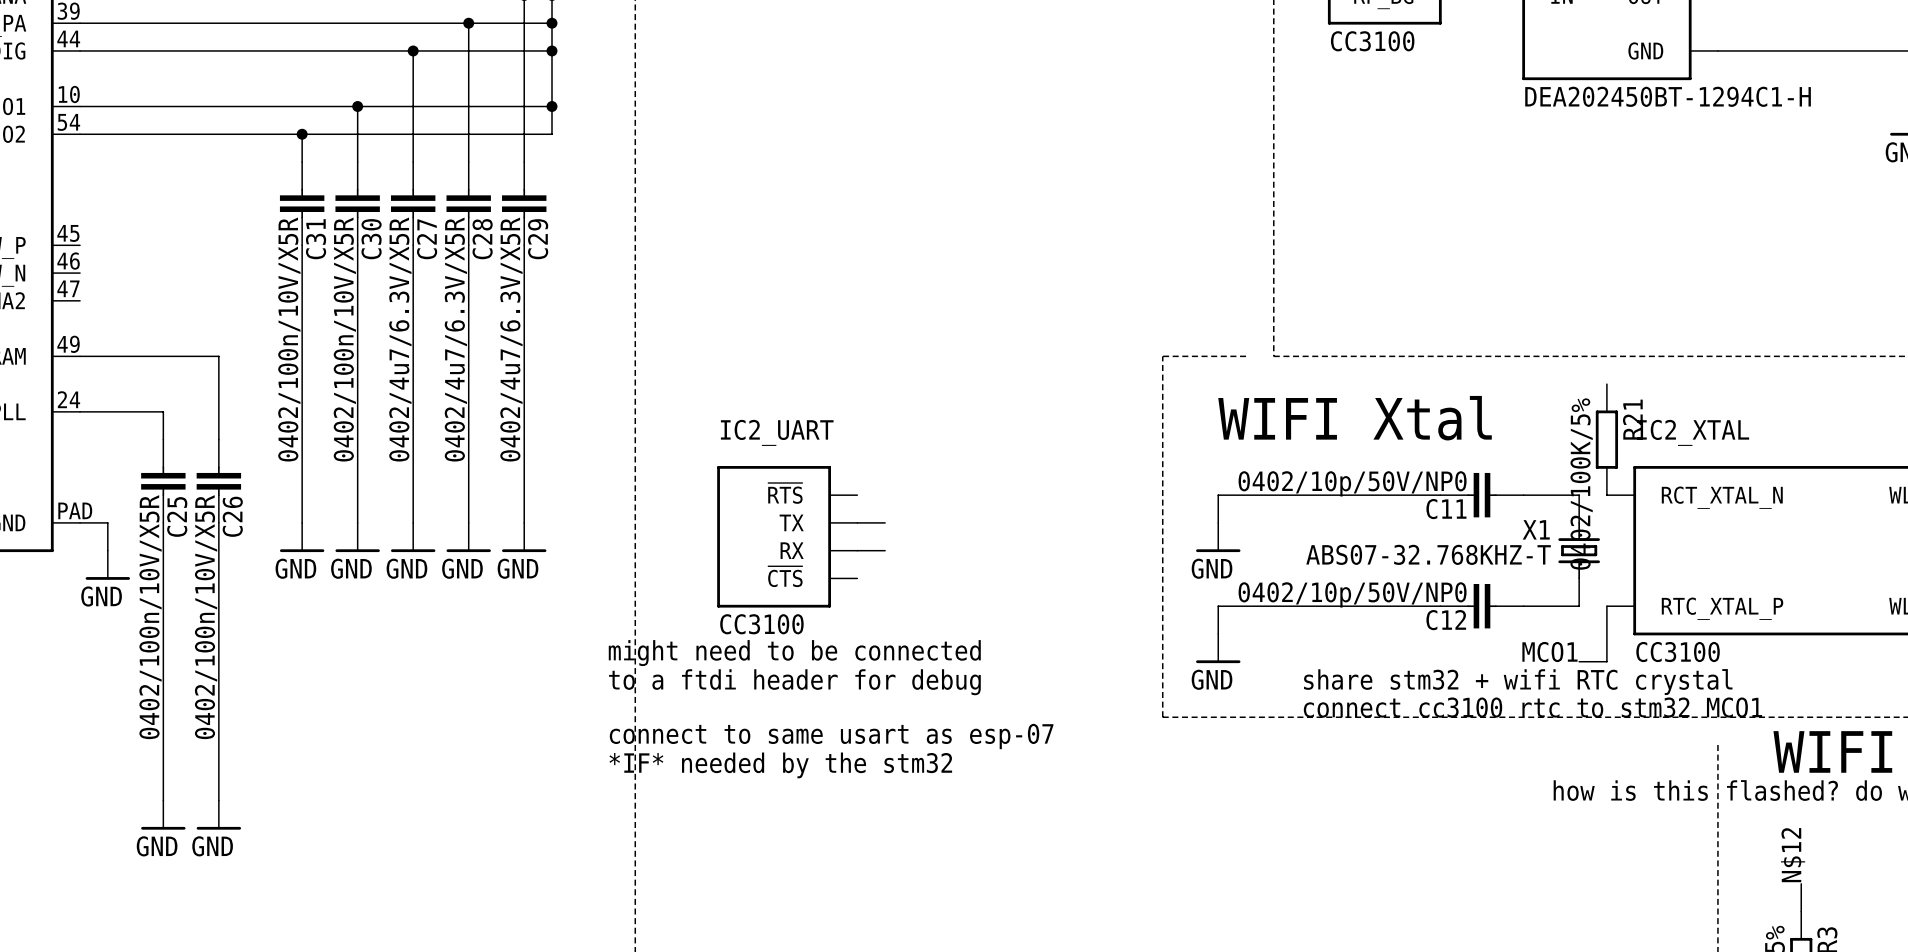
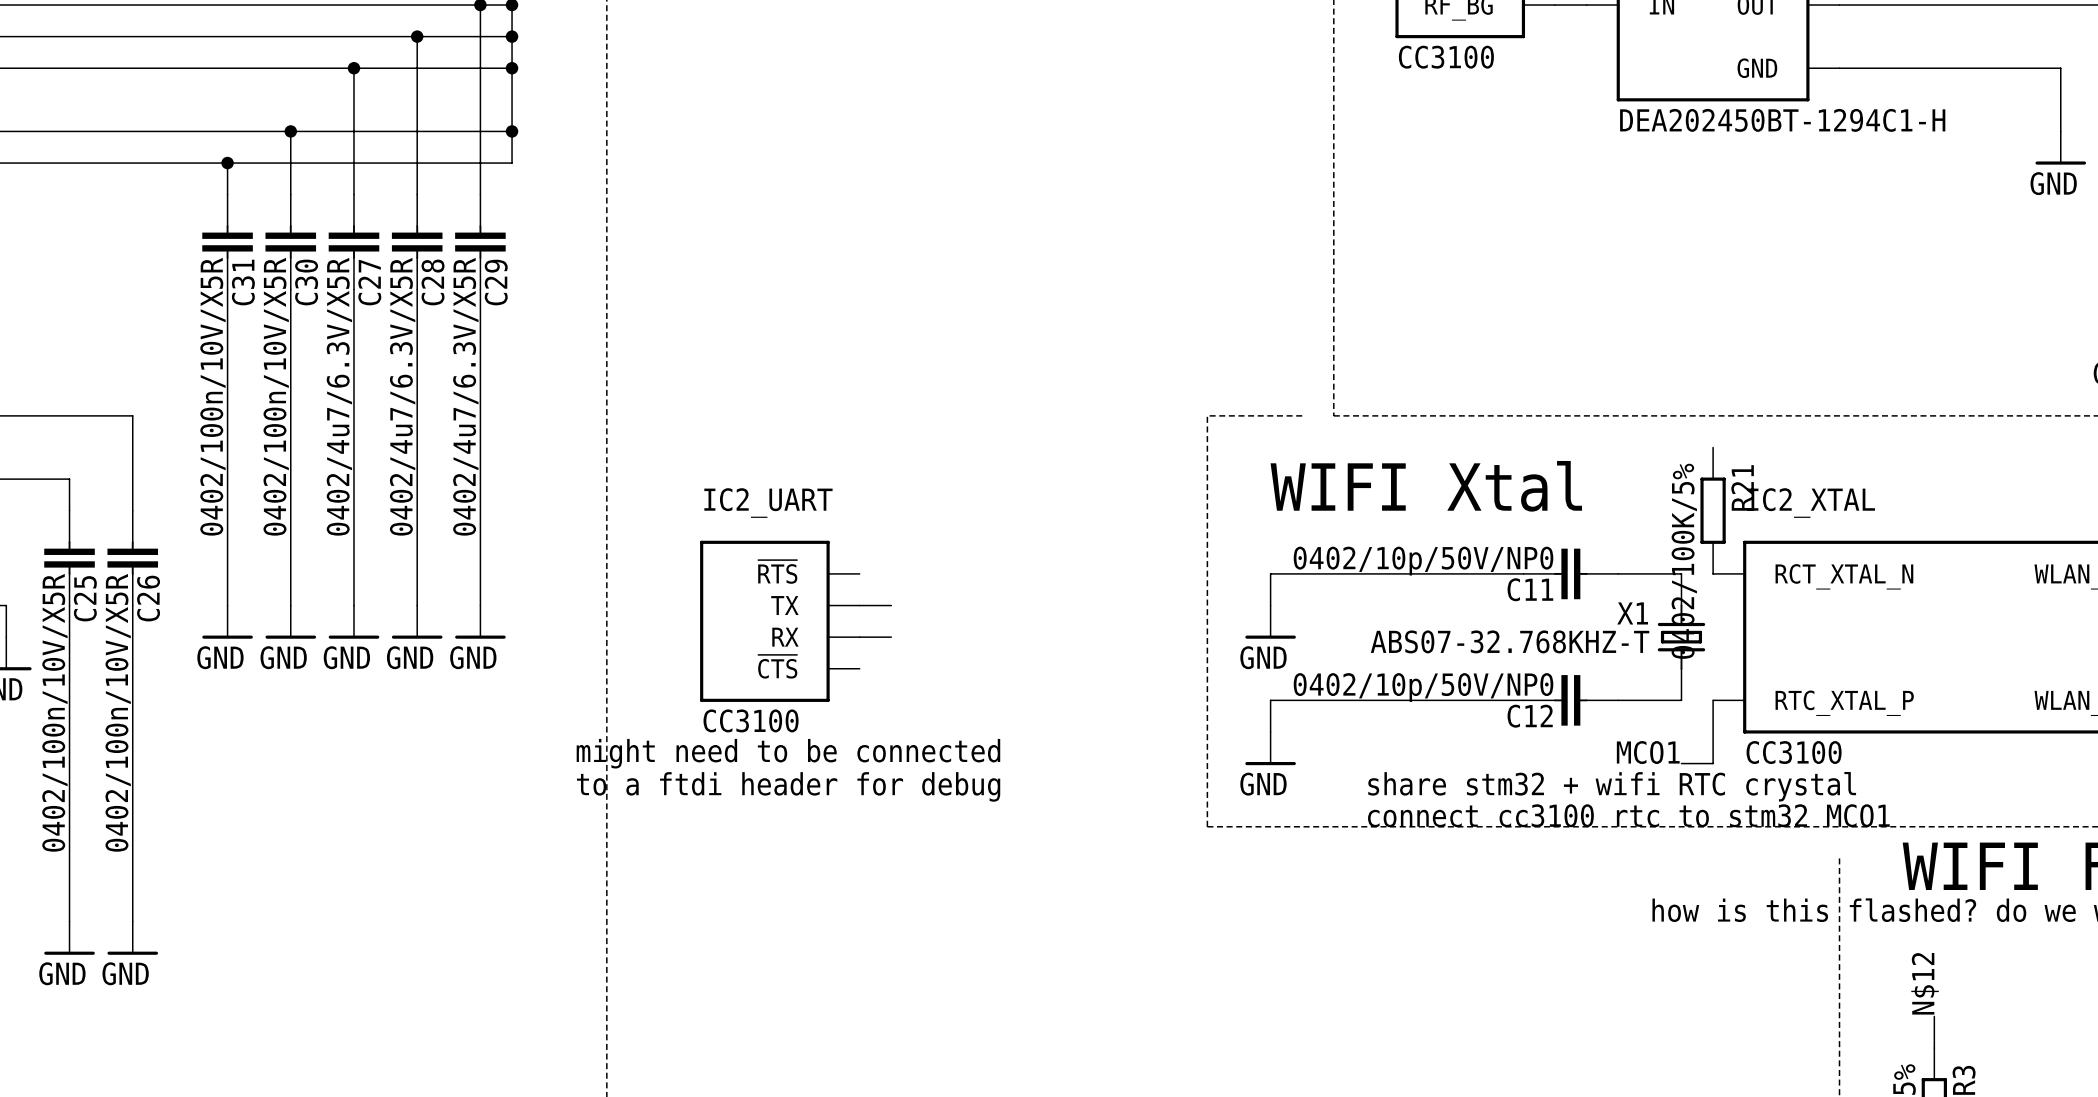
text: connect to same usart as esp-07 (831, 736) -> none
text: *IF* needed by the stm32 (780, 765) -> none

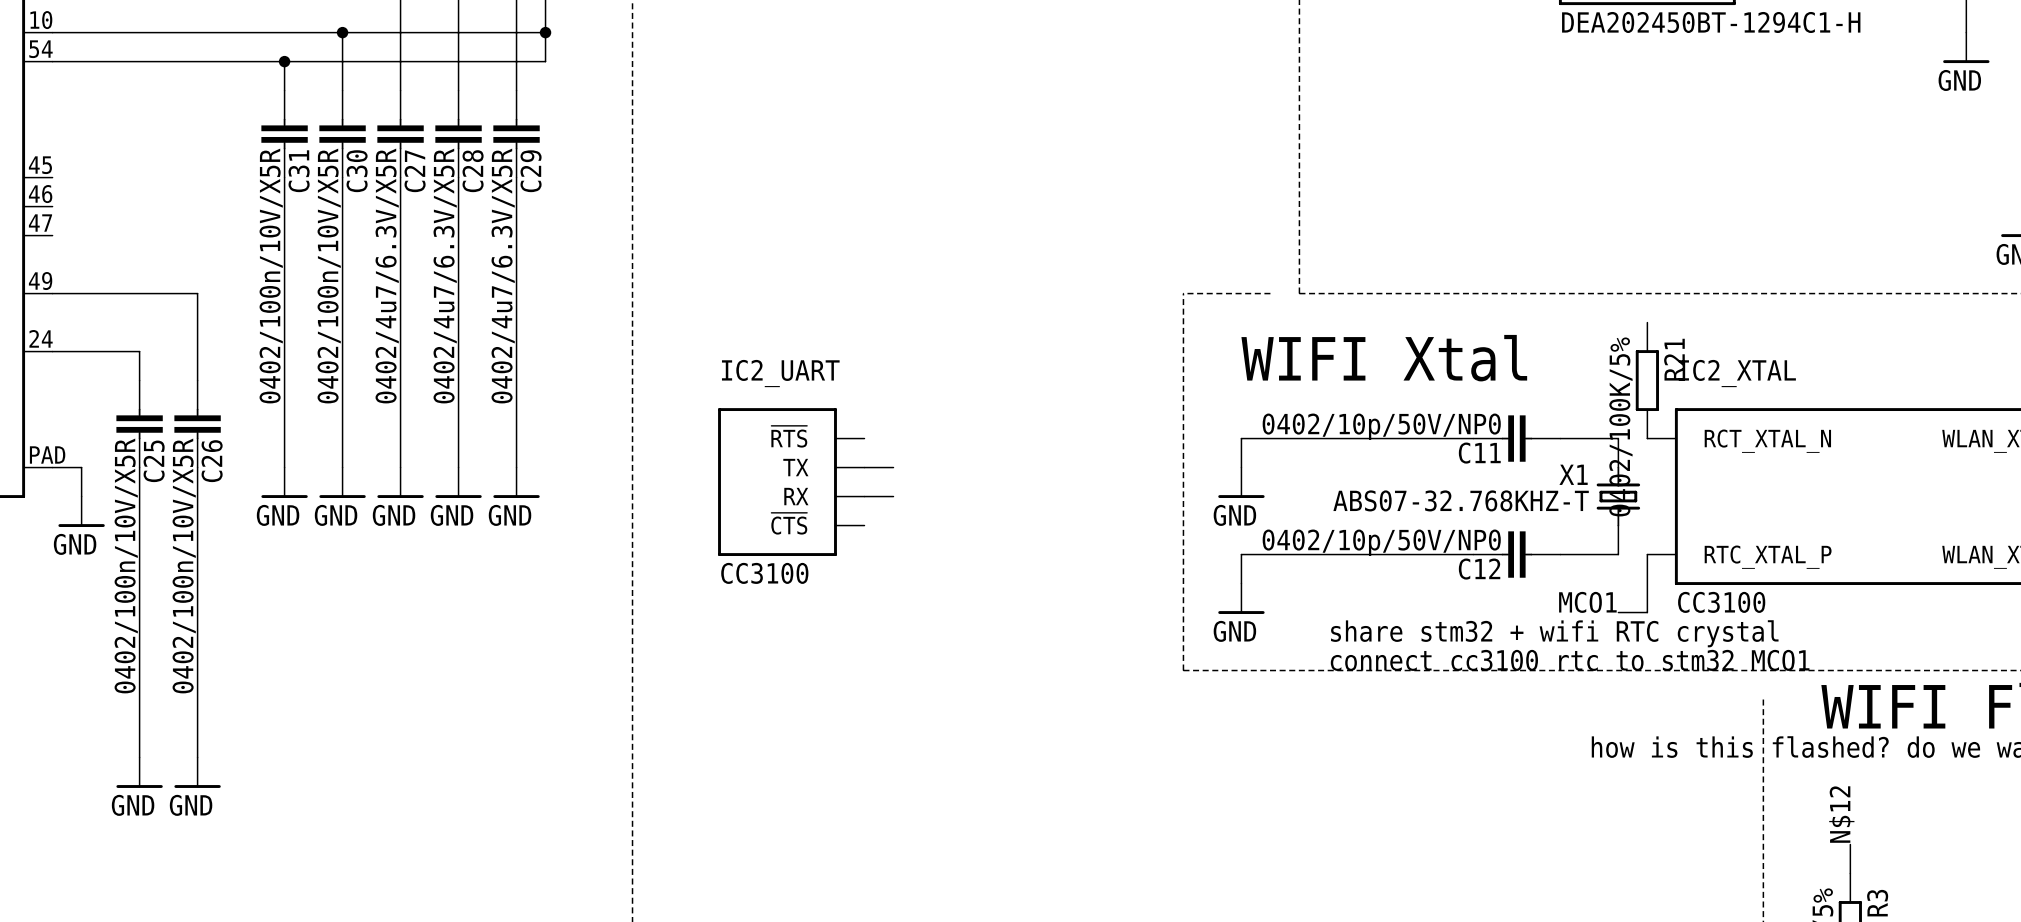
text: might need to be connected (788, 753) -> none
text: to a ftdi header for debug (788, 786) -> none

